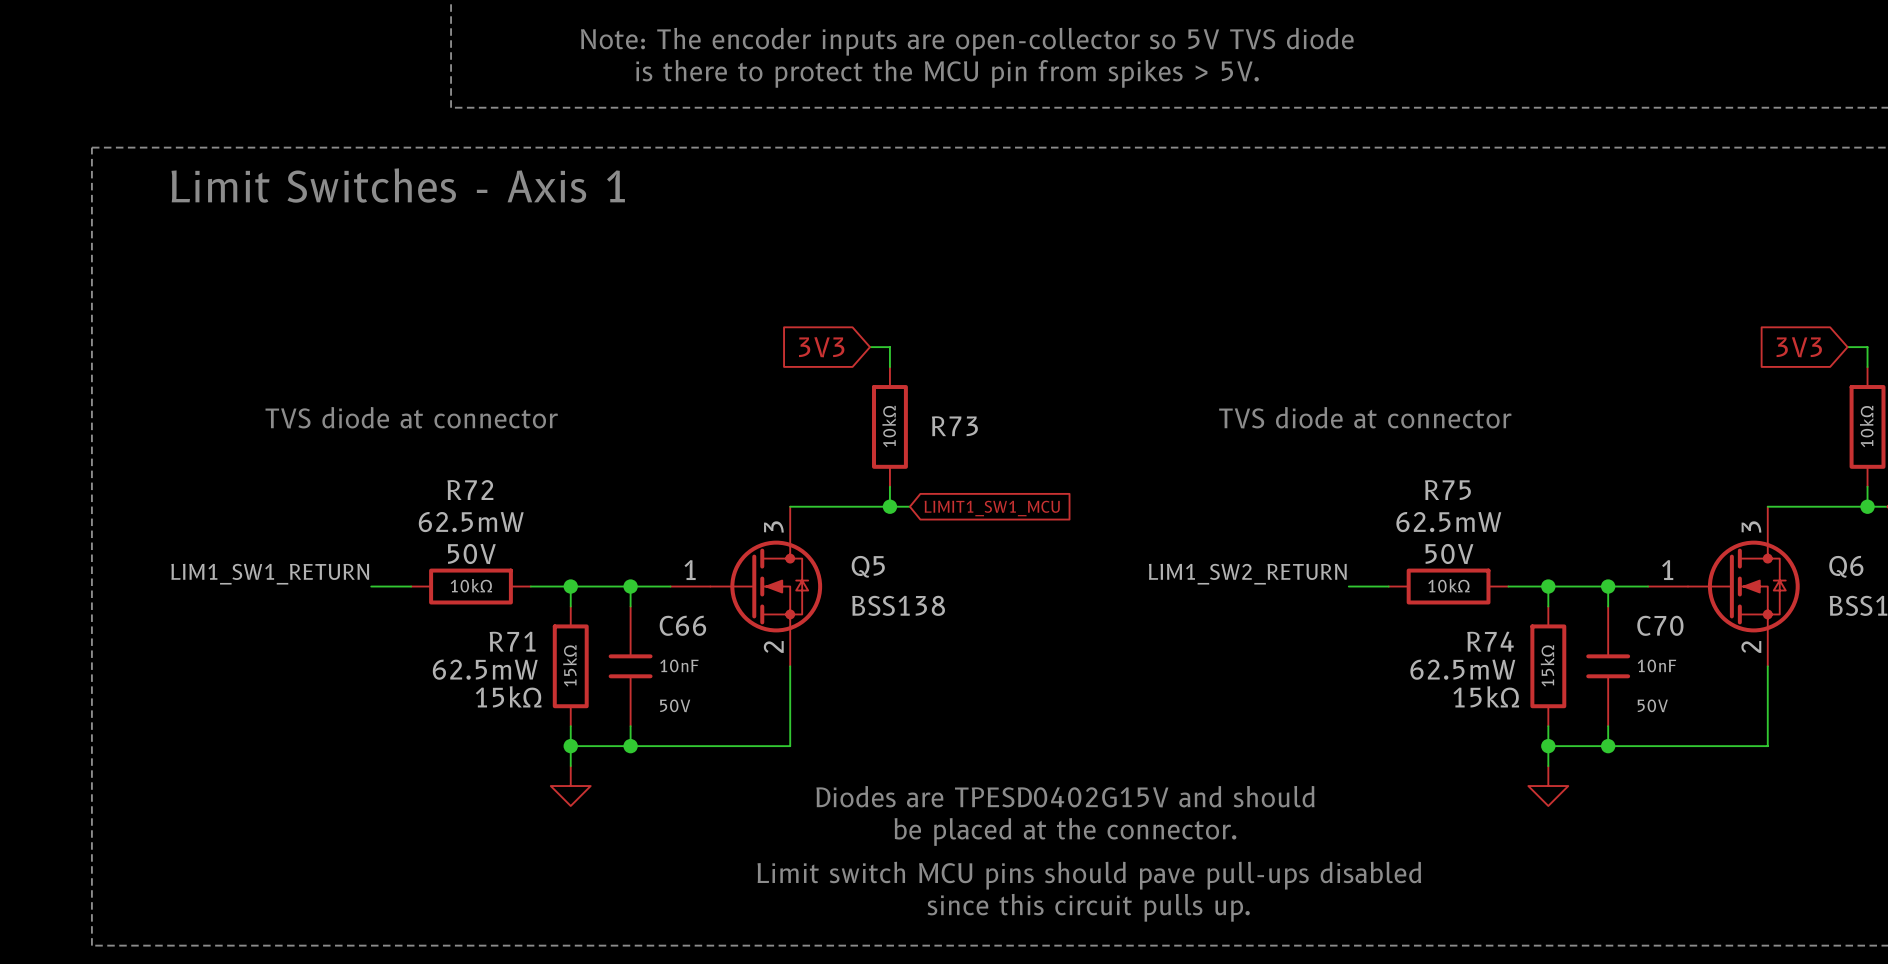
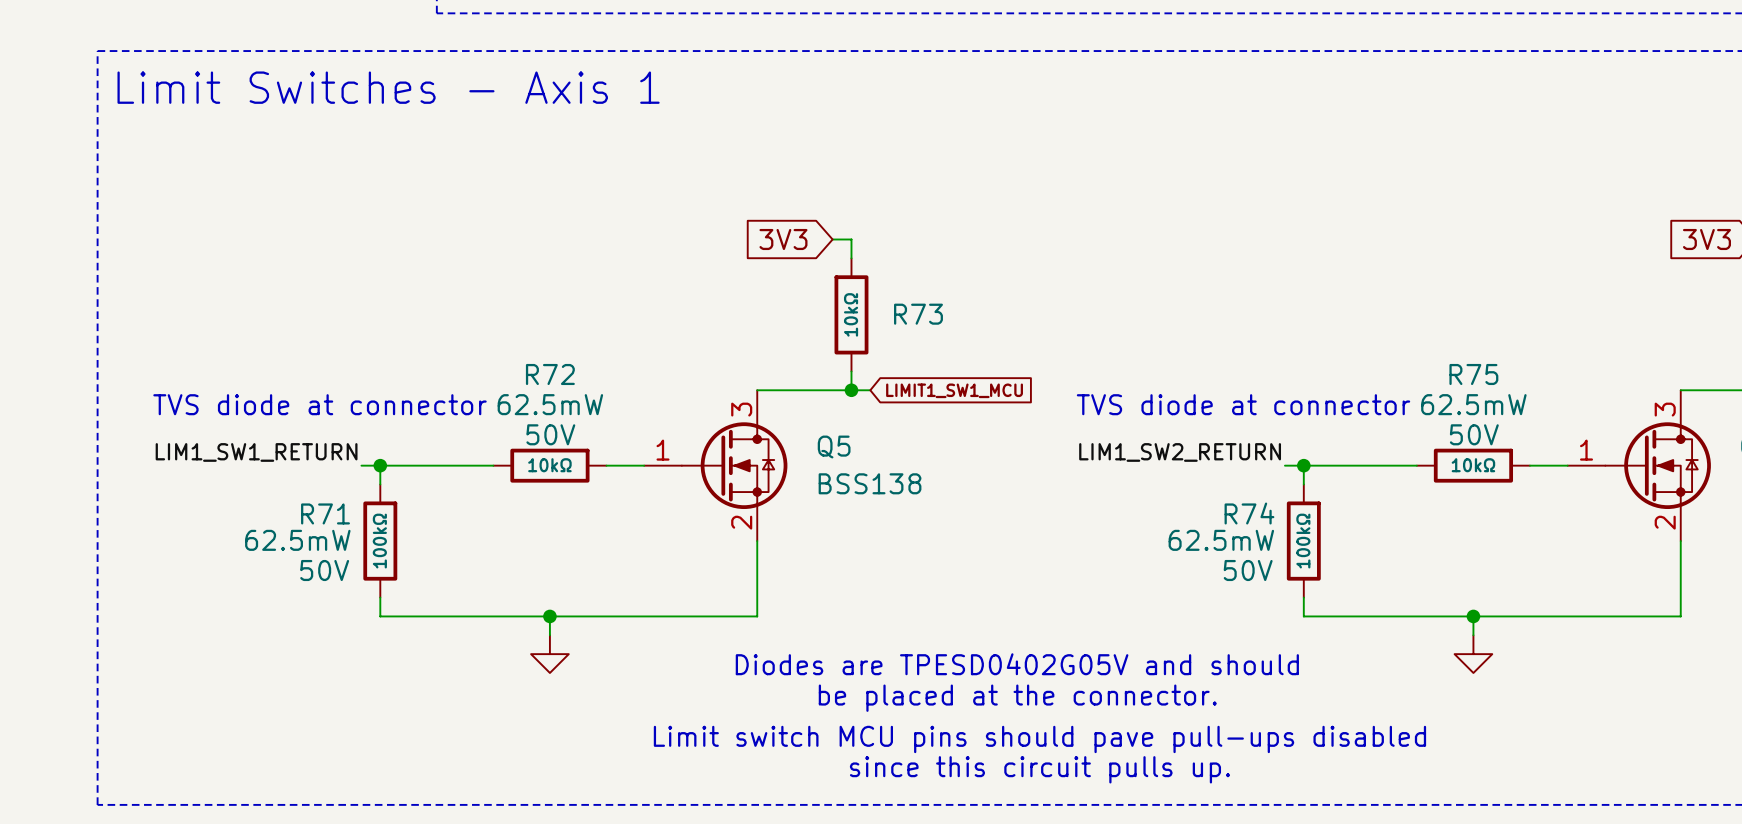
text position: TVS diode at connector (411, 417) -> TVS diode at connector (319, 404)
text position: TVS diode at connector (1365, 417) -> TVS diode at connector (1243, 404)
junction: none -> (380, 465)
wire: none -> (399, 465) (493, 465)
R72 position: (470, 586) -> (549, 465)
wire: (530, 586) (630, 586) (630, 606) -> none
wire: (570, 586) (570, 606) -> (380, 465) (380, 484)
junction: (570, 586) -> none
junction: (630, 586) -> none
junction: none -> (1303, 465)
wire: none -> (1322, 465) (1416, 465)
R75 position: (1448, 586) -> (1473, 465)
wire: (1508, 586) (1608, 586) (1608, 606) -> none
wire: (1548, 586) (1548, 606) -> (1303, 465) (1303, 484)
junction: (1548, 586) -> none
junction: (1608, 586) -> none
R71 name position: R71 (512, 641) -> R71 (325, 513)
R74 name position: R74 (1490, 641) -> R74 (1249, 513)
R71 value: 15kΩ (569, 665) -> 100kΩ (379, 541)
R74 value: 15kΩ (1547, 665) -> 100kΩ (1303, 541)
R71 position: (570, 666) -> (380, 541)
C66: 10nF (630, 666) -> none
R74 position: (1548, 666) -> (1303, 541)
C70: 10nF (1608, 666) -> none
R71 text position: 62.5mW (485, 669) -> 62.5mW (297, 540)
R74 text position: 62.5mW (1462, 669) -> 62.5mW (1221, 540)
R71 text: 15kΩ (508, 696) -> none
R74 text: 15kΩ (1486, 696) -> none
R71 text: none -> 50V (324, 570)
R74 text: none -> 50V (1248, 570)
wire: (570, 726) (570, 746) -> (380, 597) (380, 616) (549, 616)
wire: (630, 726) (630, 746) -> none
wire: (1548, 726) (1548, 746) -> (1303, 597) (1303, 616) (1473, 616)
wire: (1608, 726) (1608, 746) -> none
junction: (630, 746) -> none
junction: (1608, 746) -> none
text: Diodes are TPESD0402G15V and should (1065, 796) -> Diodes are TPESD0402G05V and should (1017, 664)

